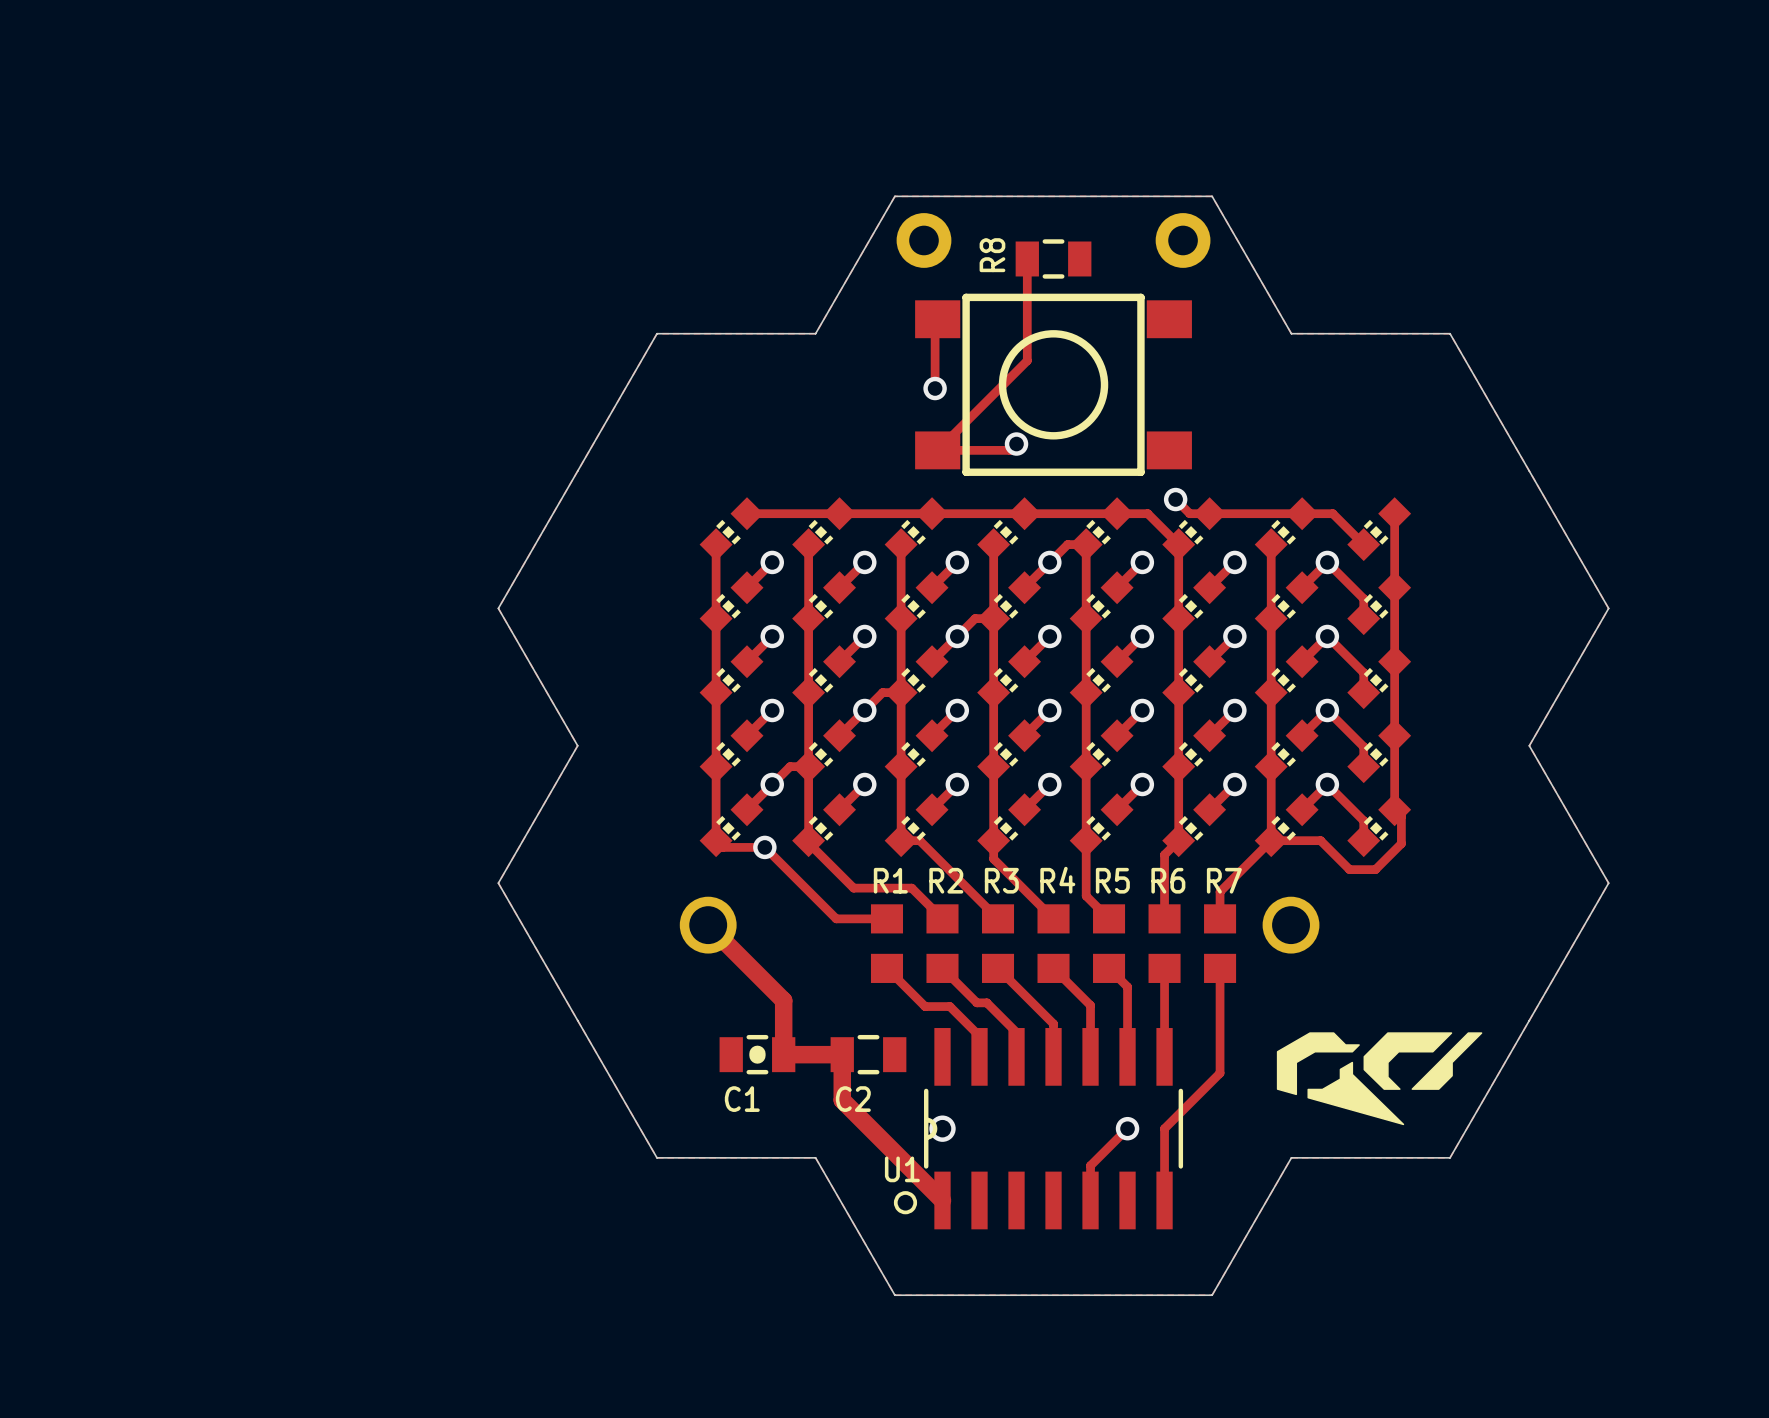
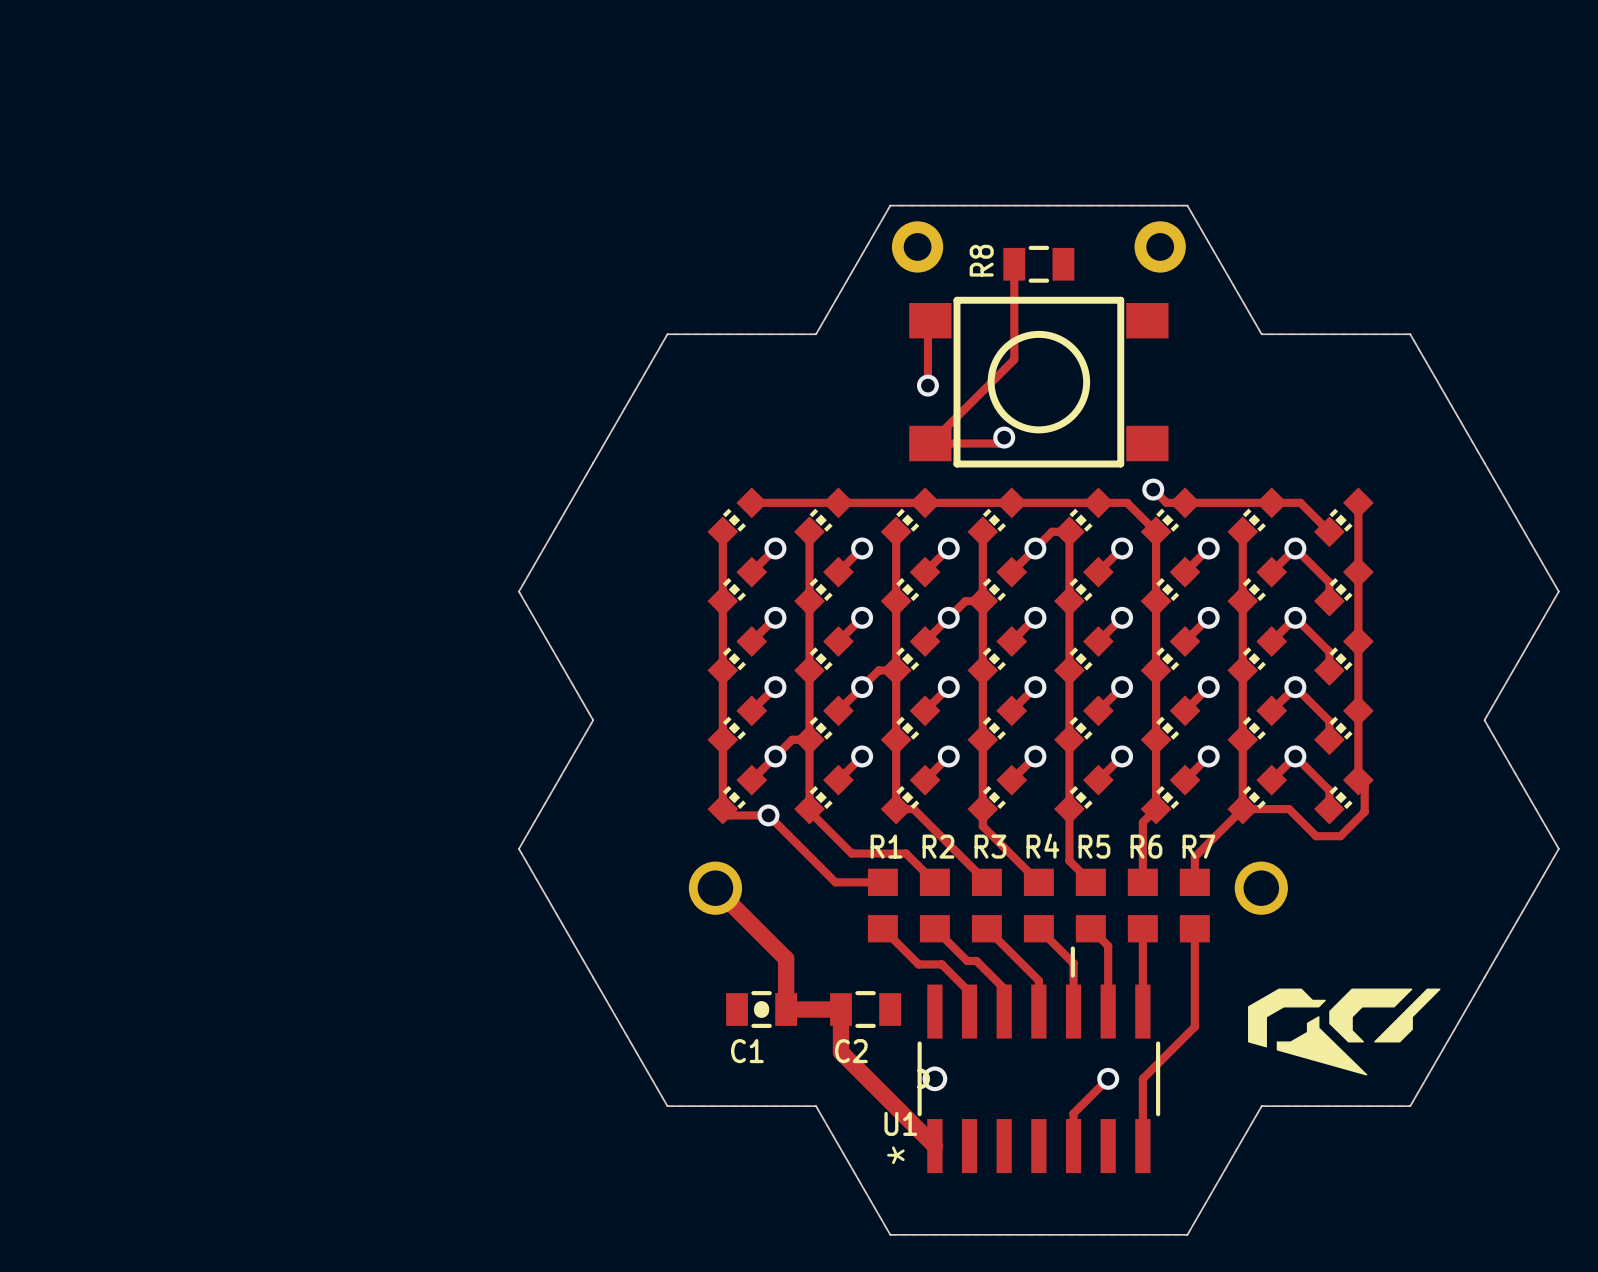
U1 footprint: [893, 1028, 1184, 1230] -> [917, 946, 1161, 1174]

